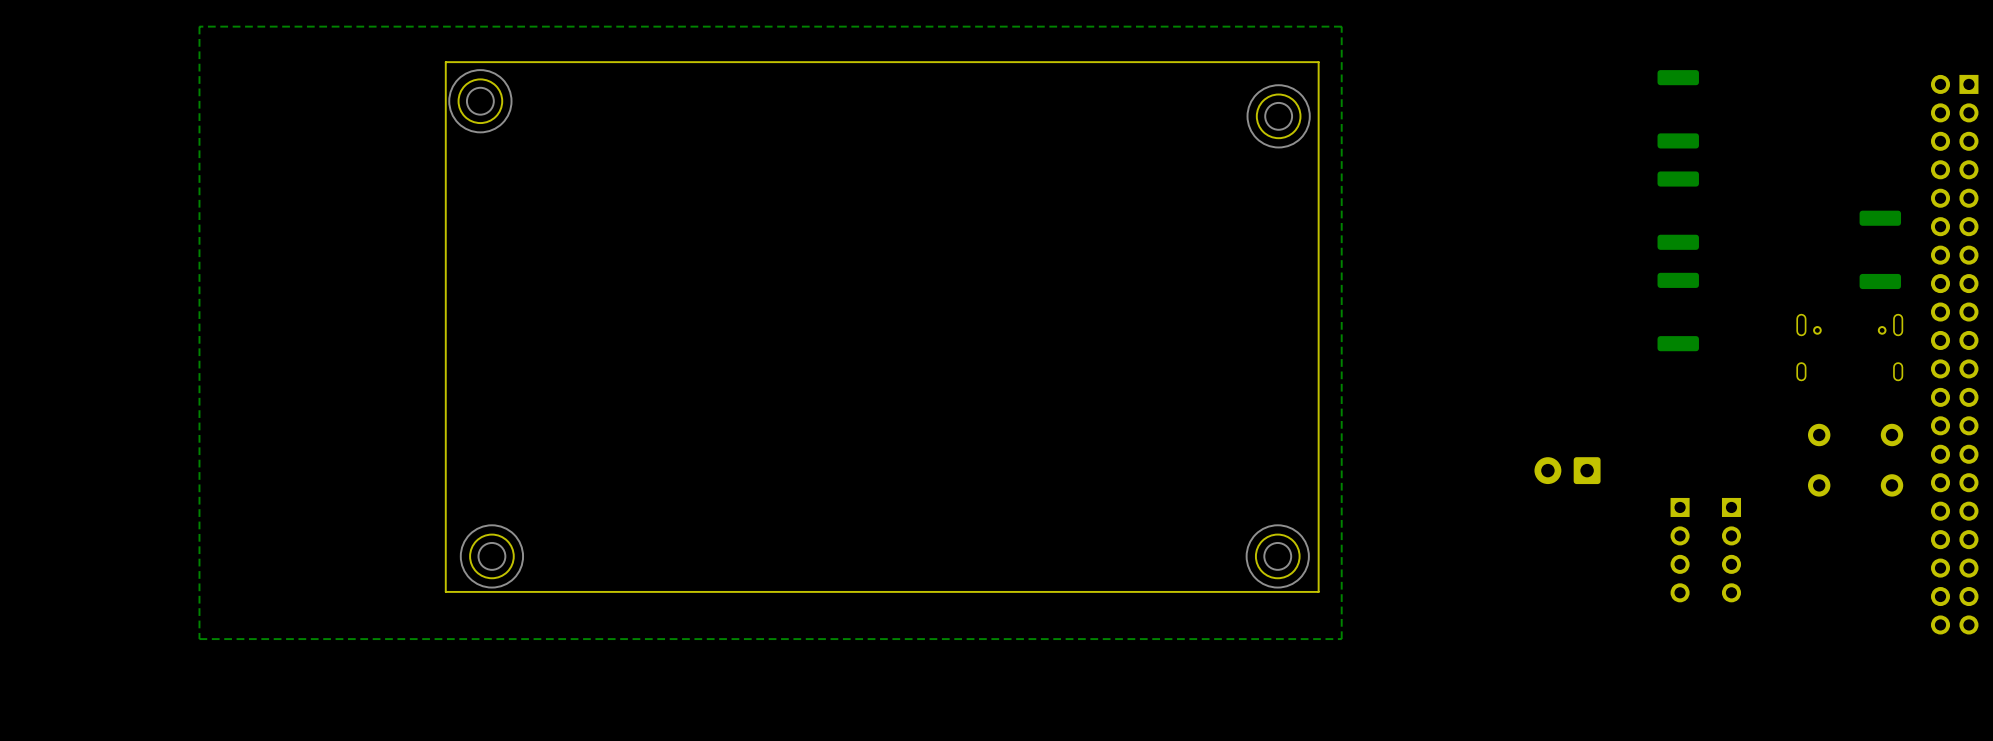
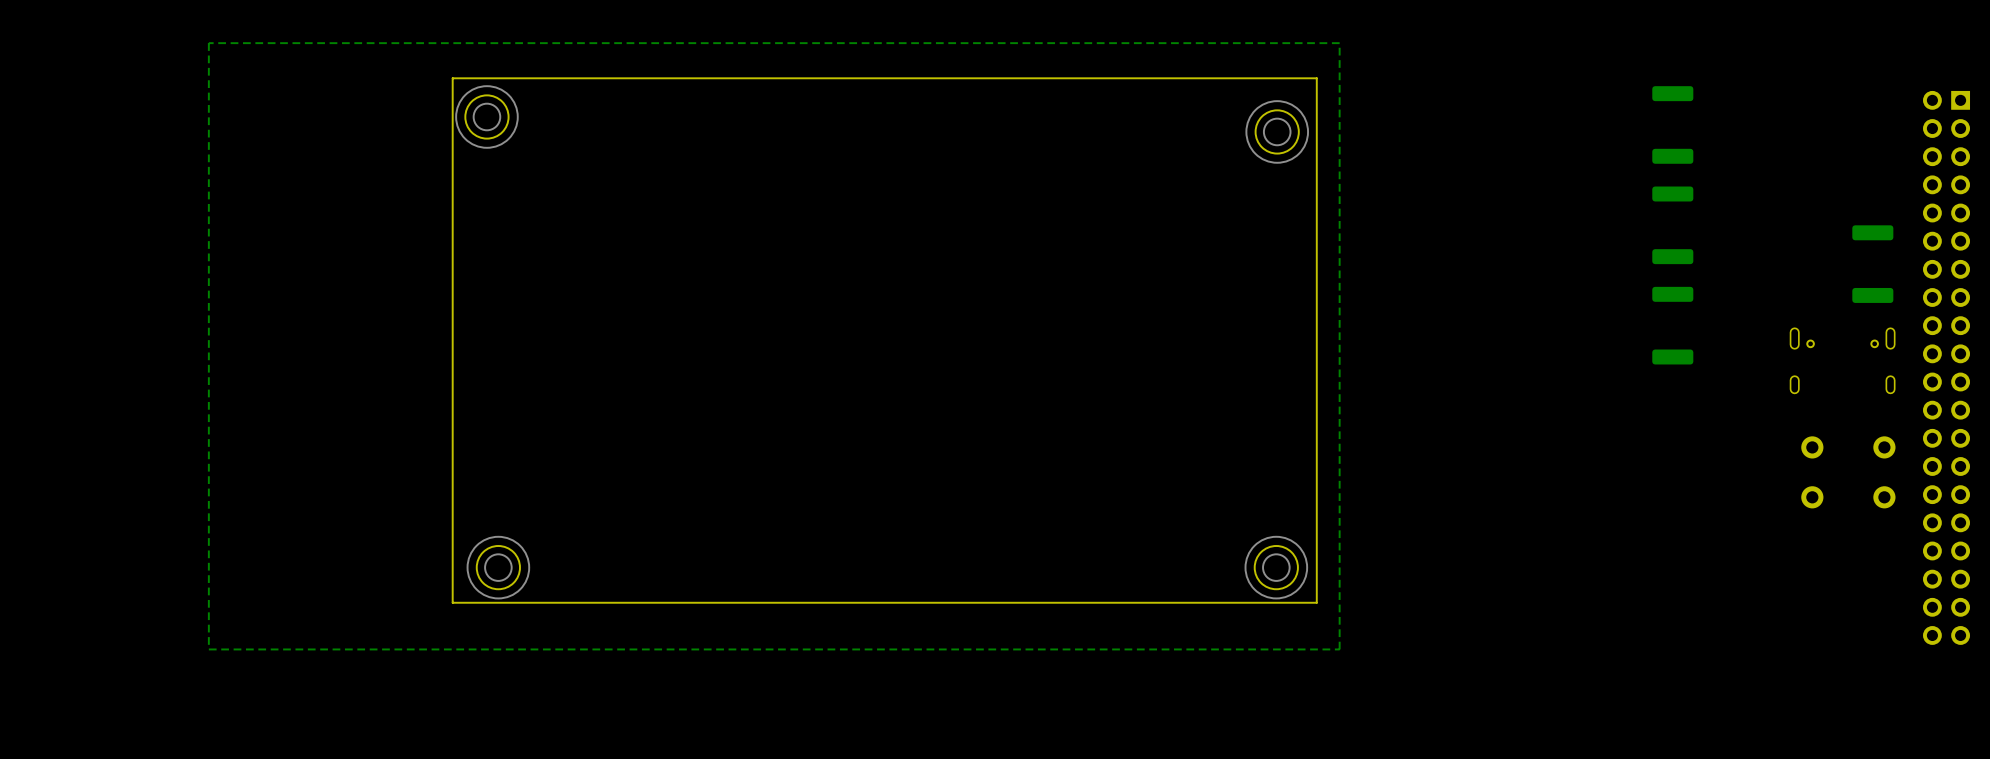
part: (1567, 470) -> none
part: (1680, 550) -> none
part: (1731, 550) -> none

